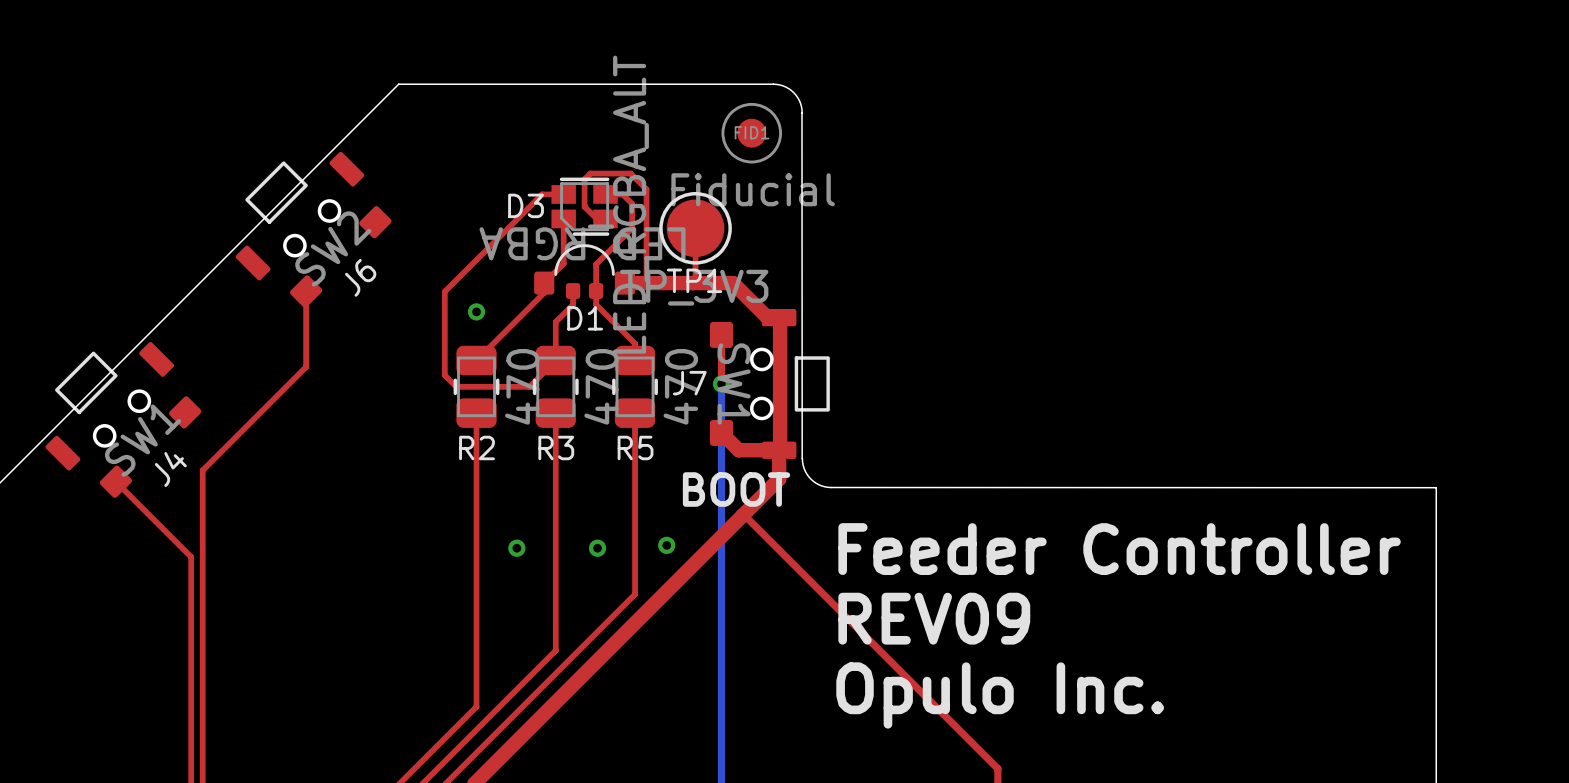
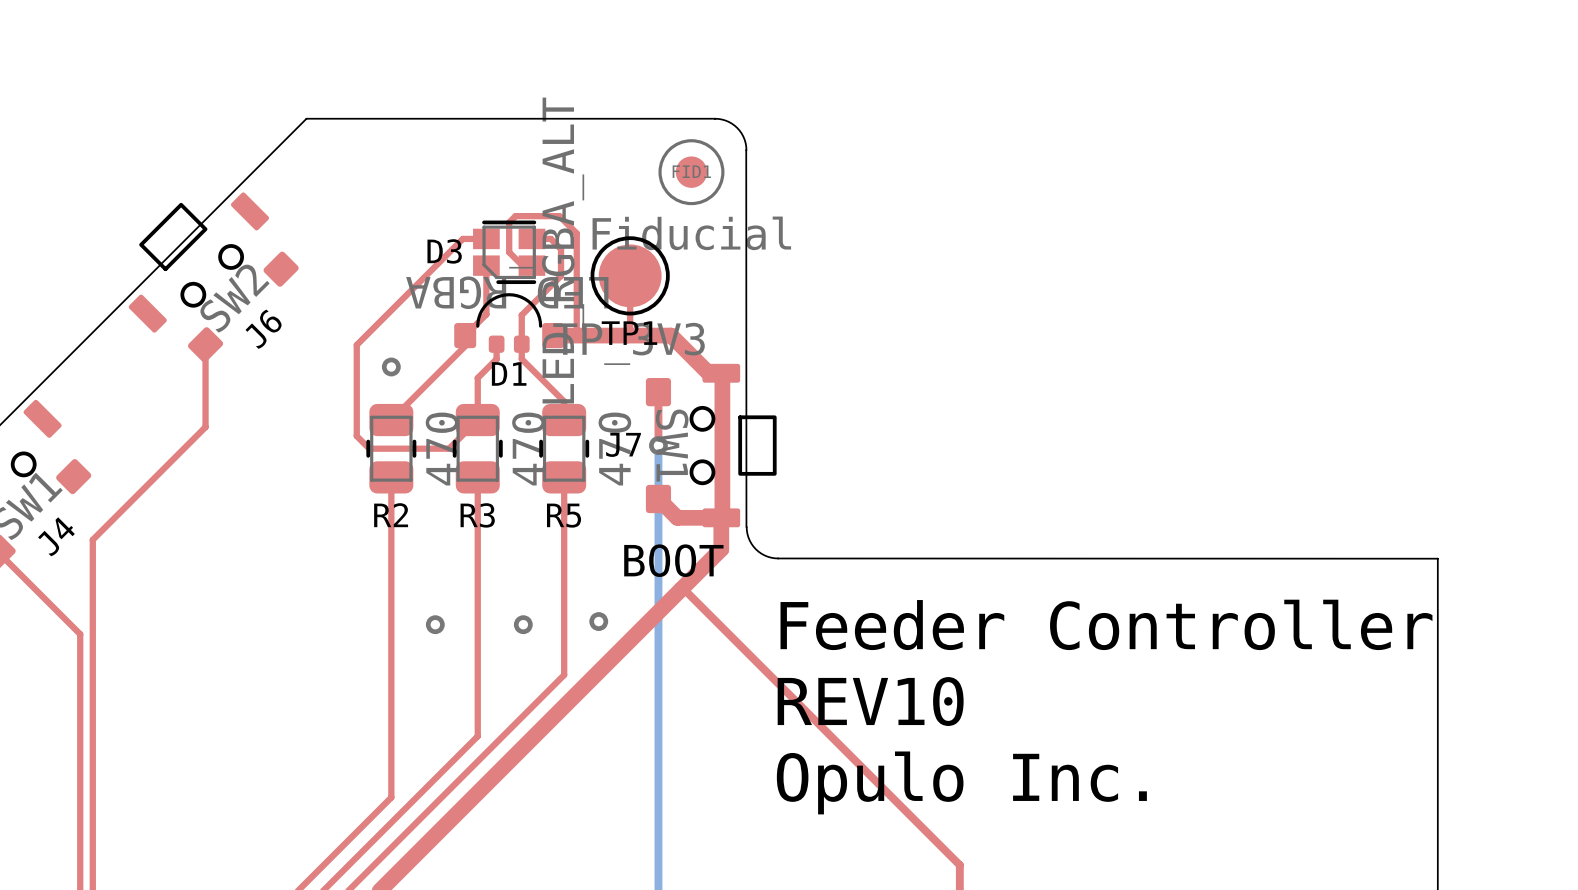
text: REV09 (934, 618) -> REV10 (870, 701)

